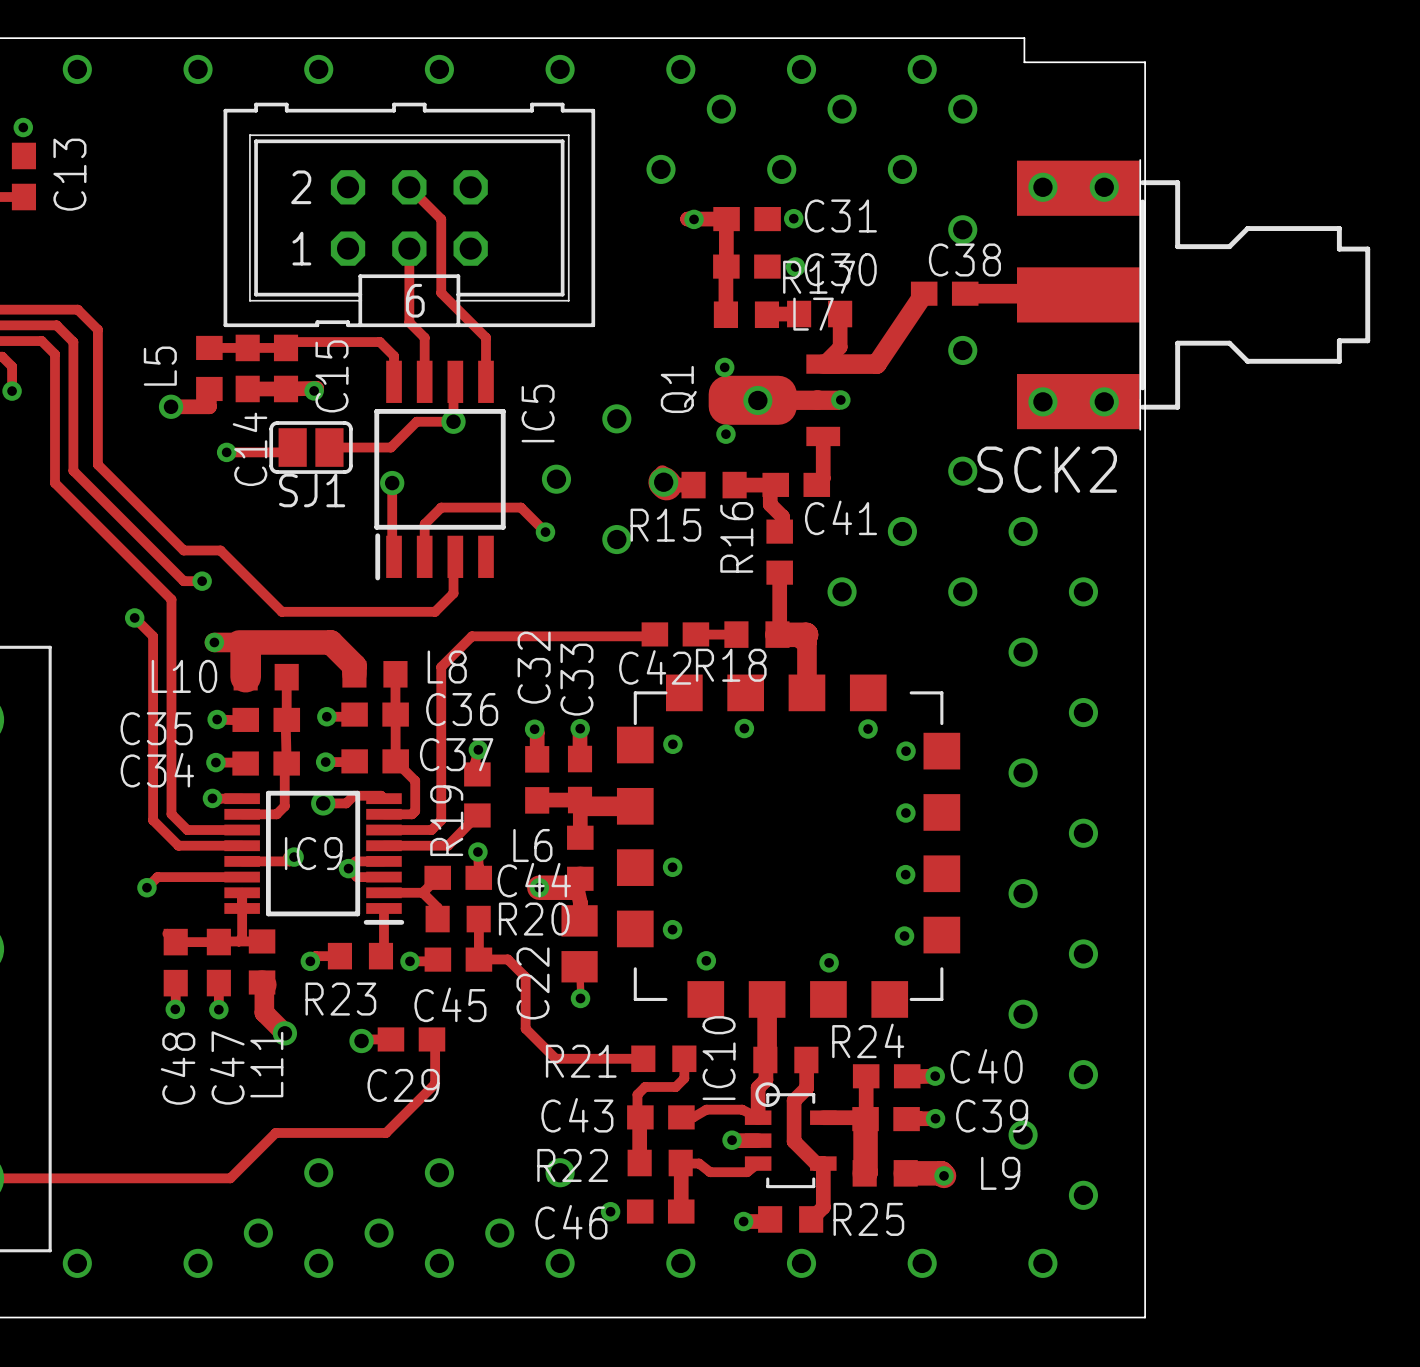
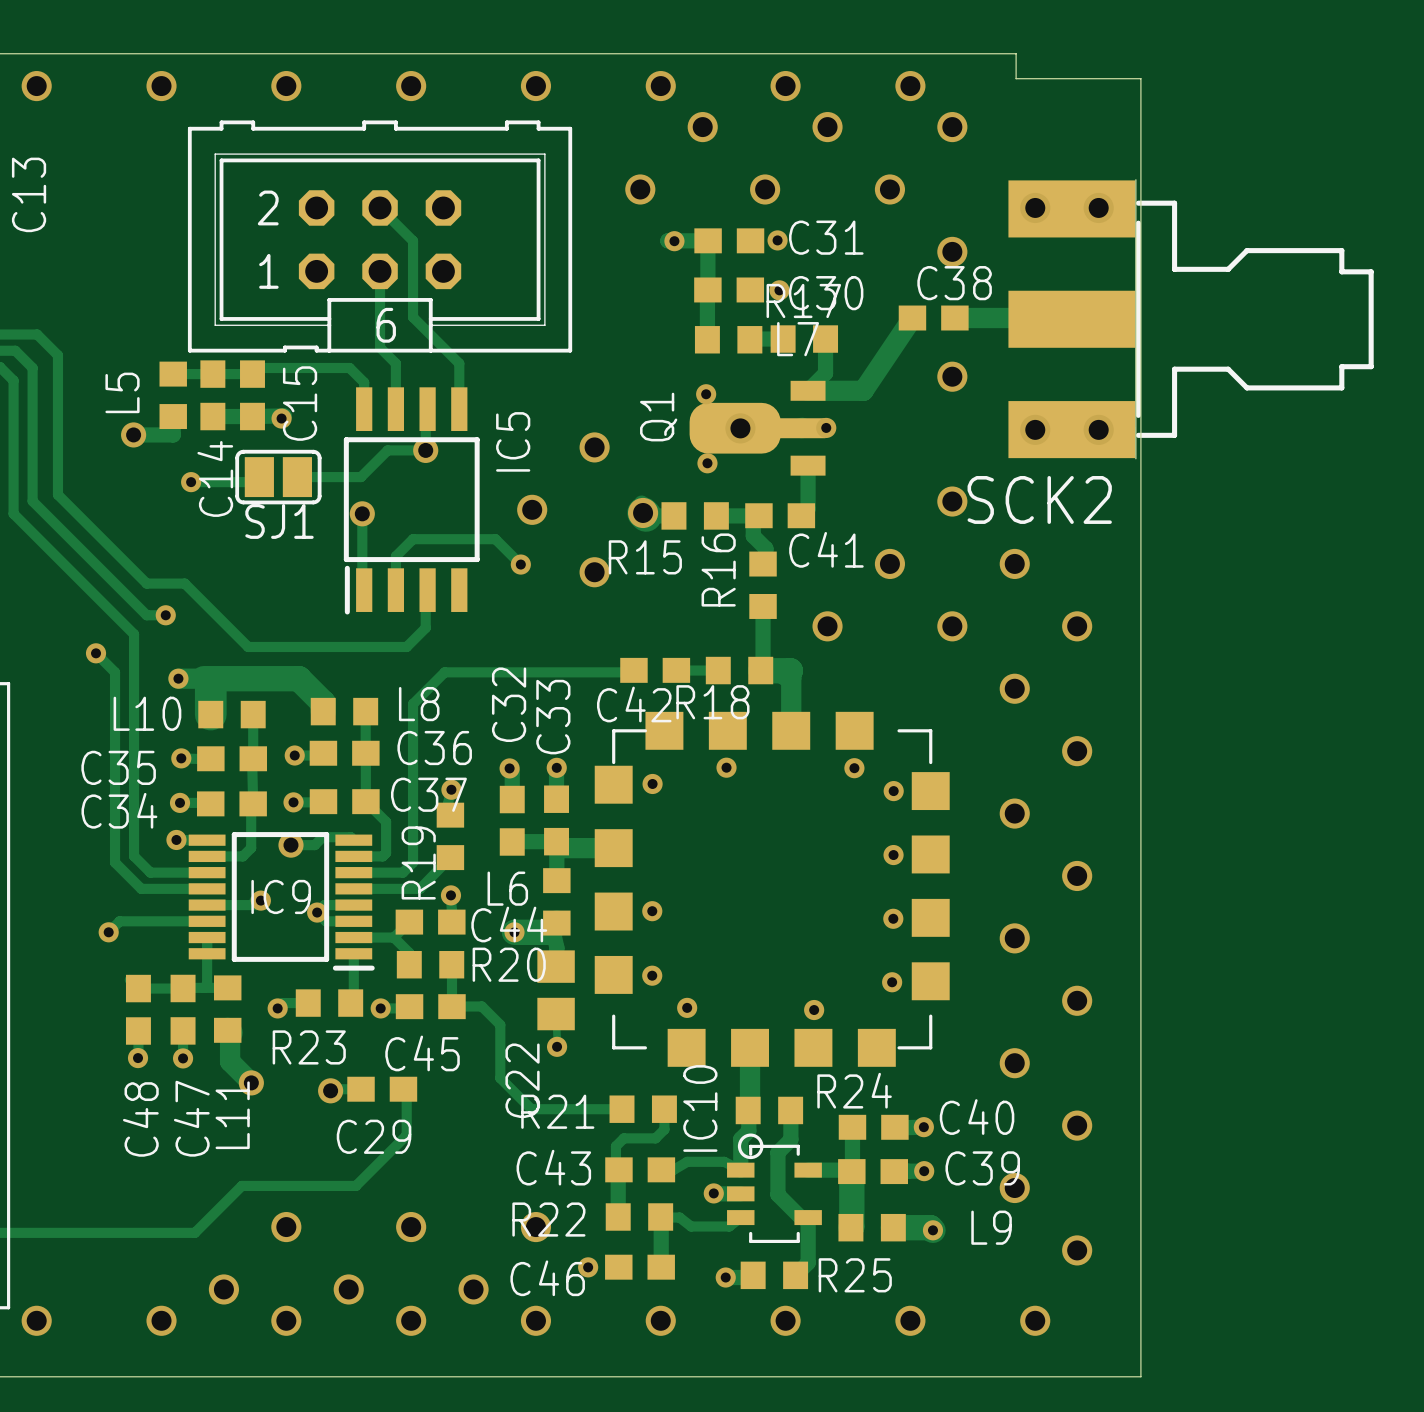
C22 name position: C22 (533, 983) -> C22 (522, 1080)

